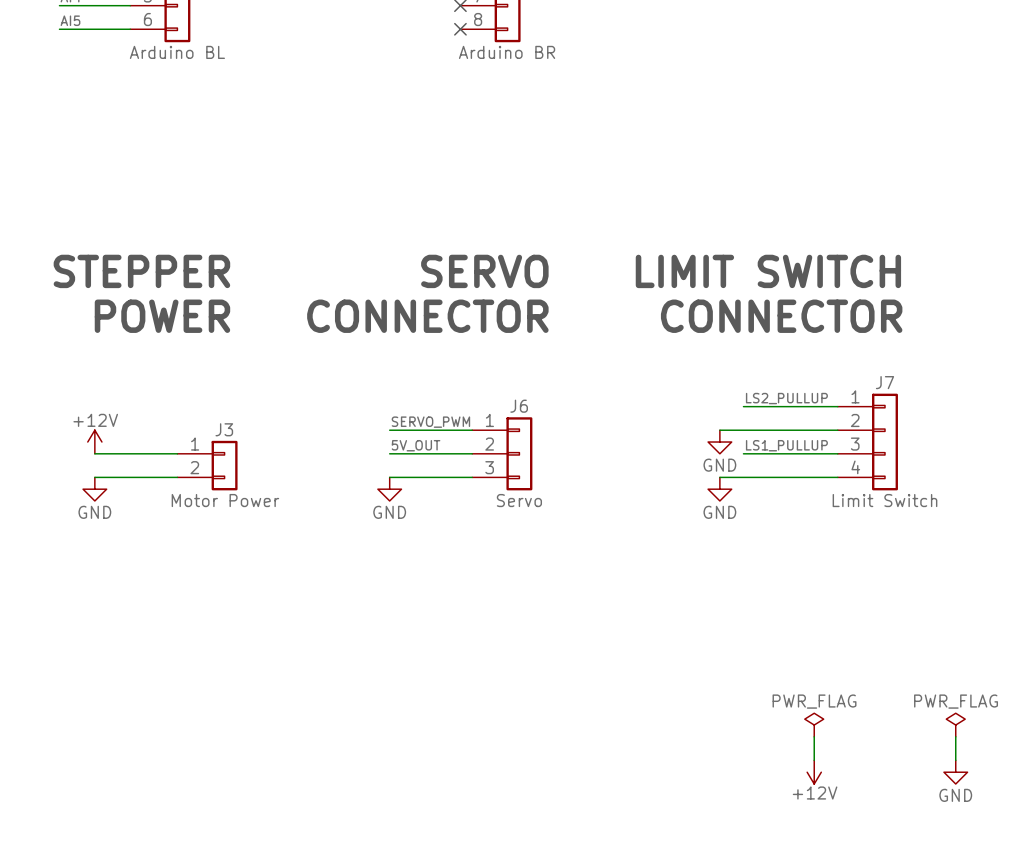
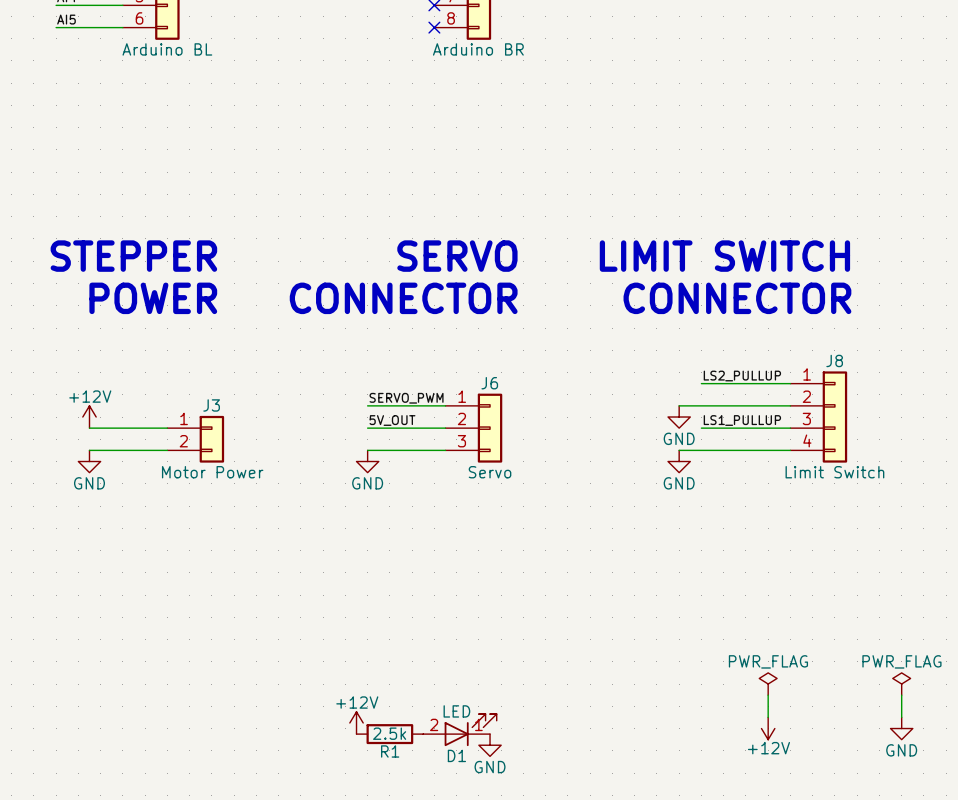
J7 name: J7 (884, 382) -> J8 (834, 360)
power symbol: none -> +12V (356, 722)
D1: none -> LED (459, 730)
R1: none -> 2.5k (389, 734)
power symbol: none -> GND (490, 745)

